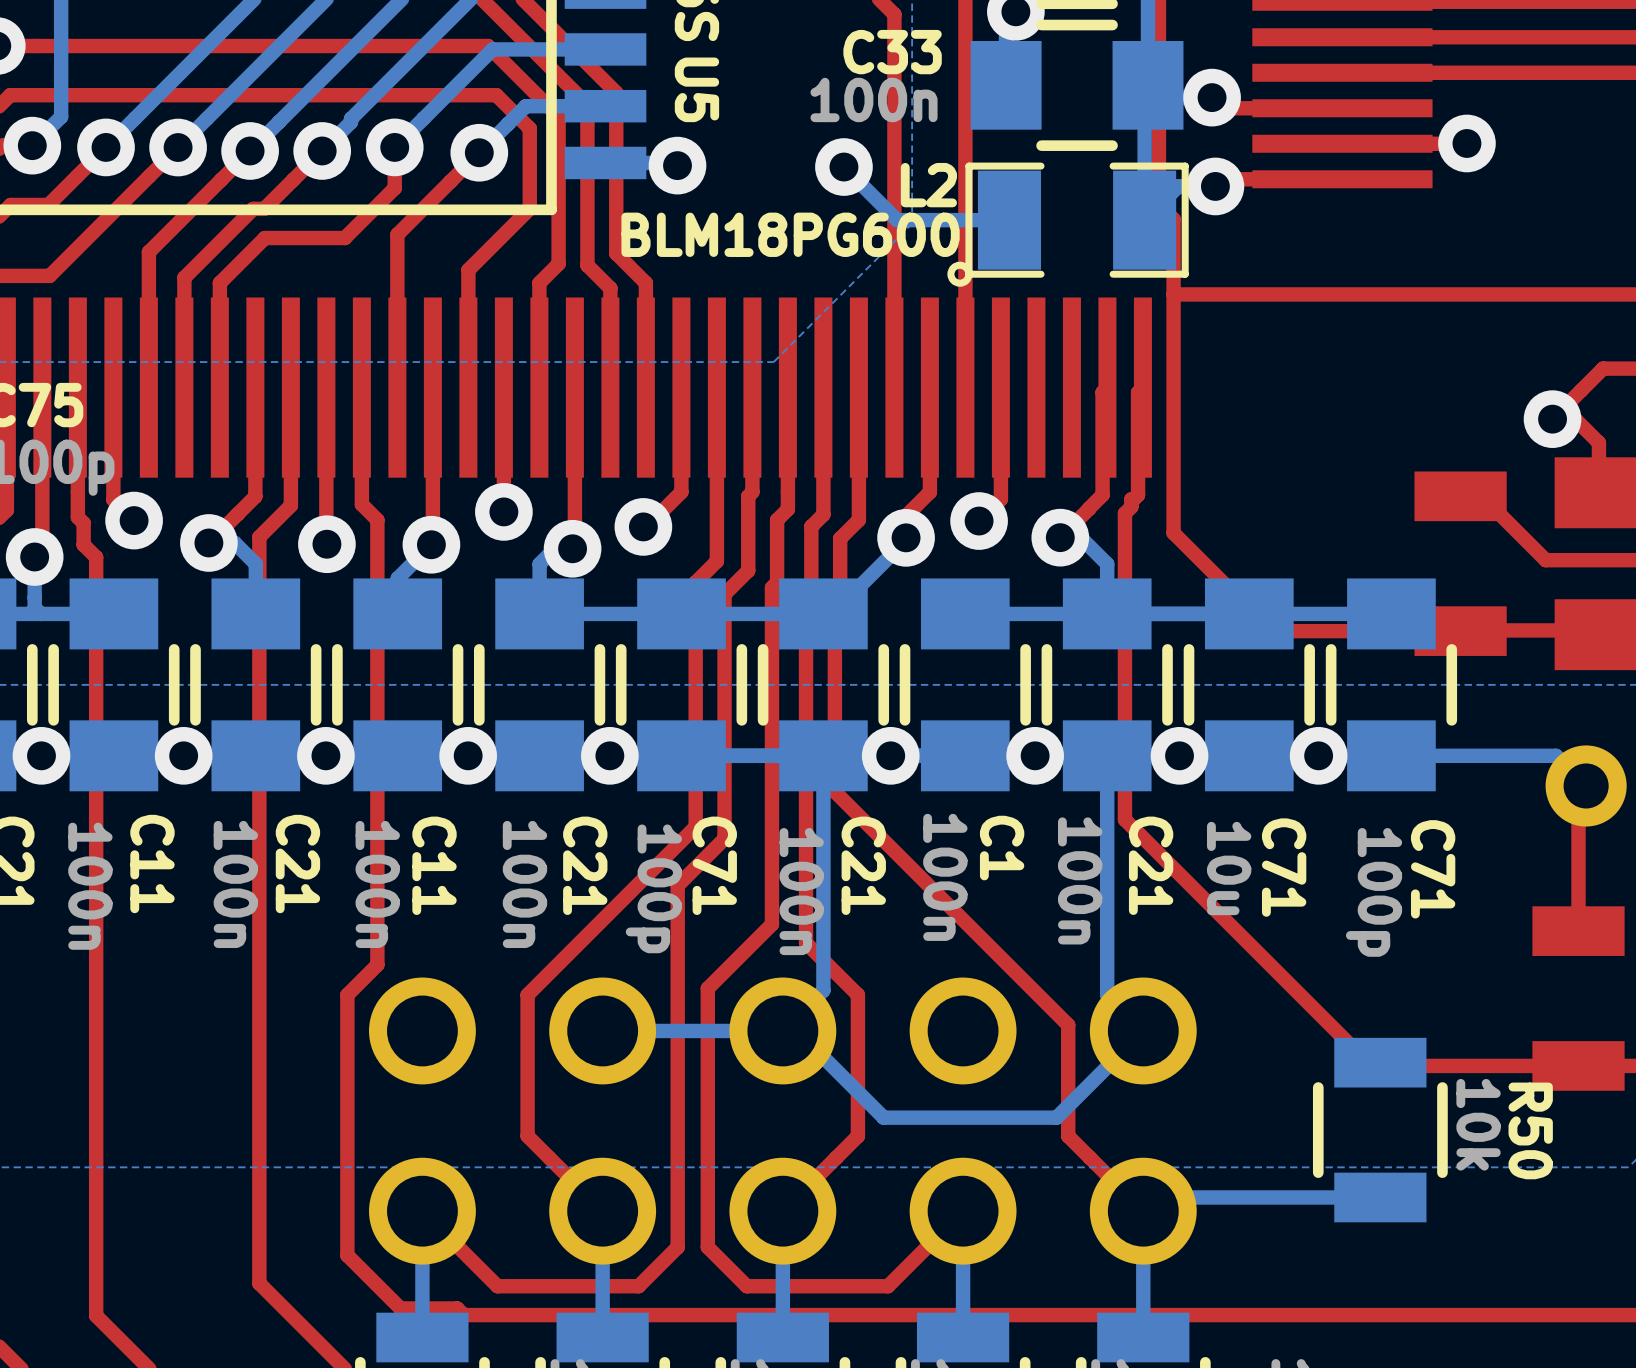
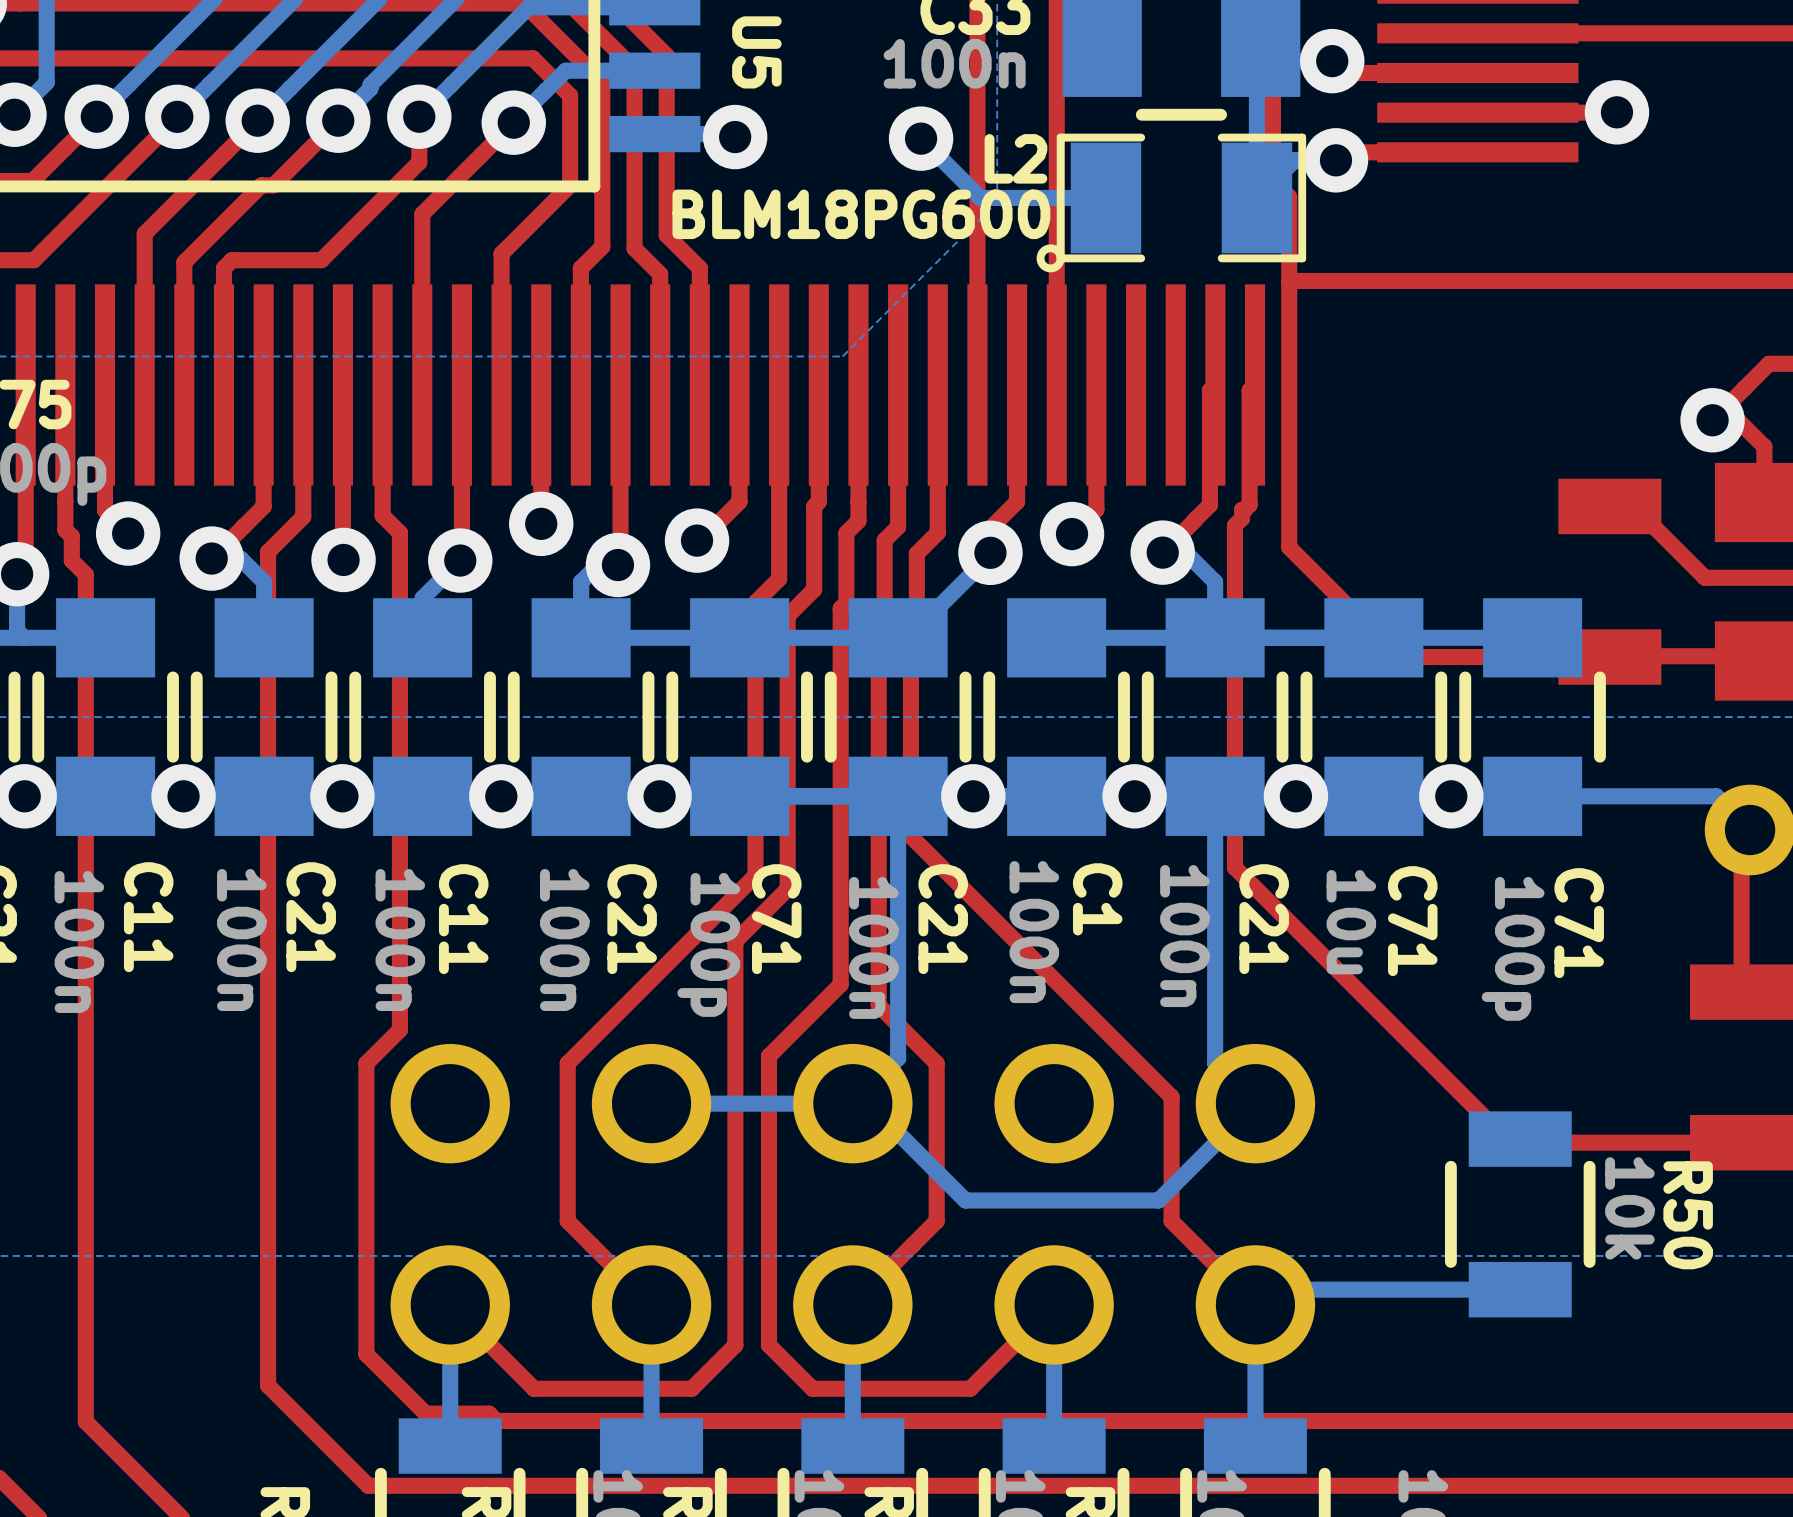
top track: (344, 238) (264, 238) (227, 275) -> (363, 217) (321, 260) (232, 260)

